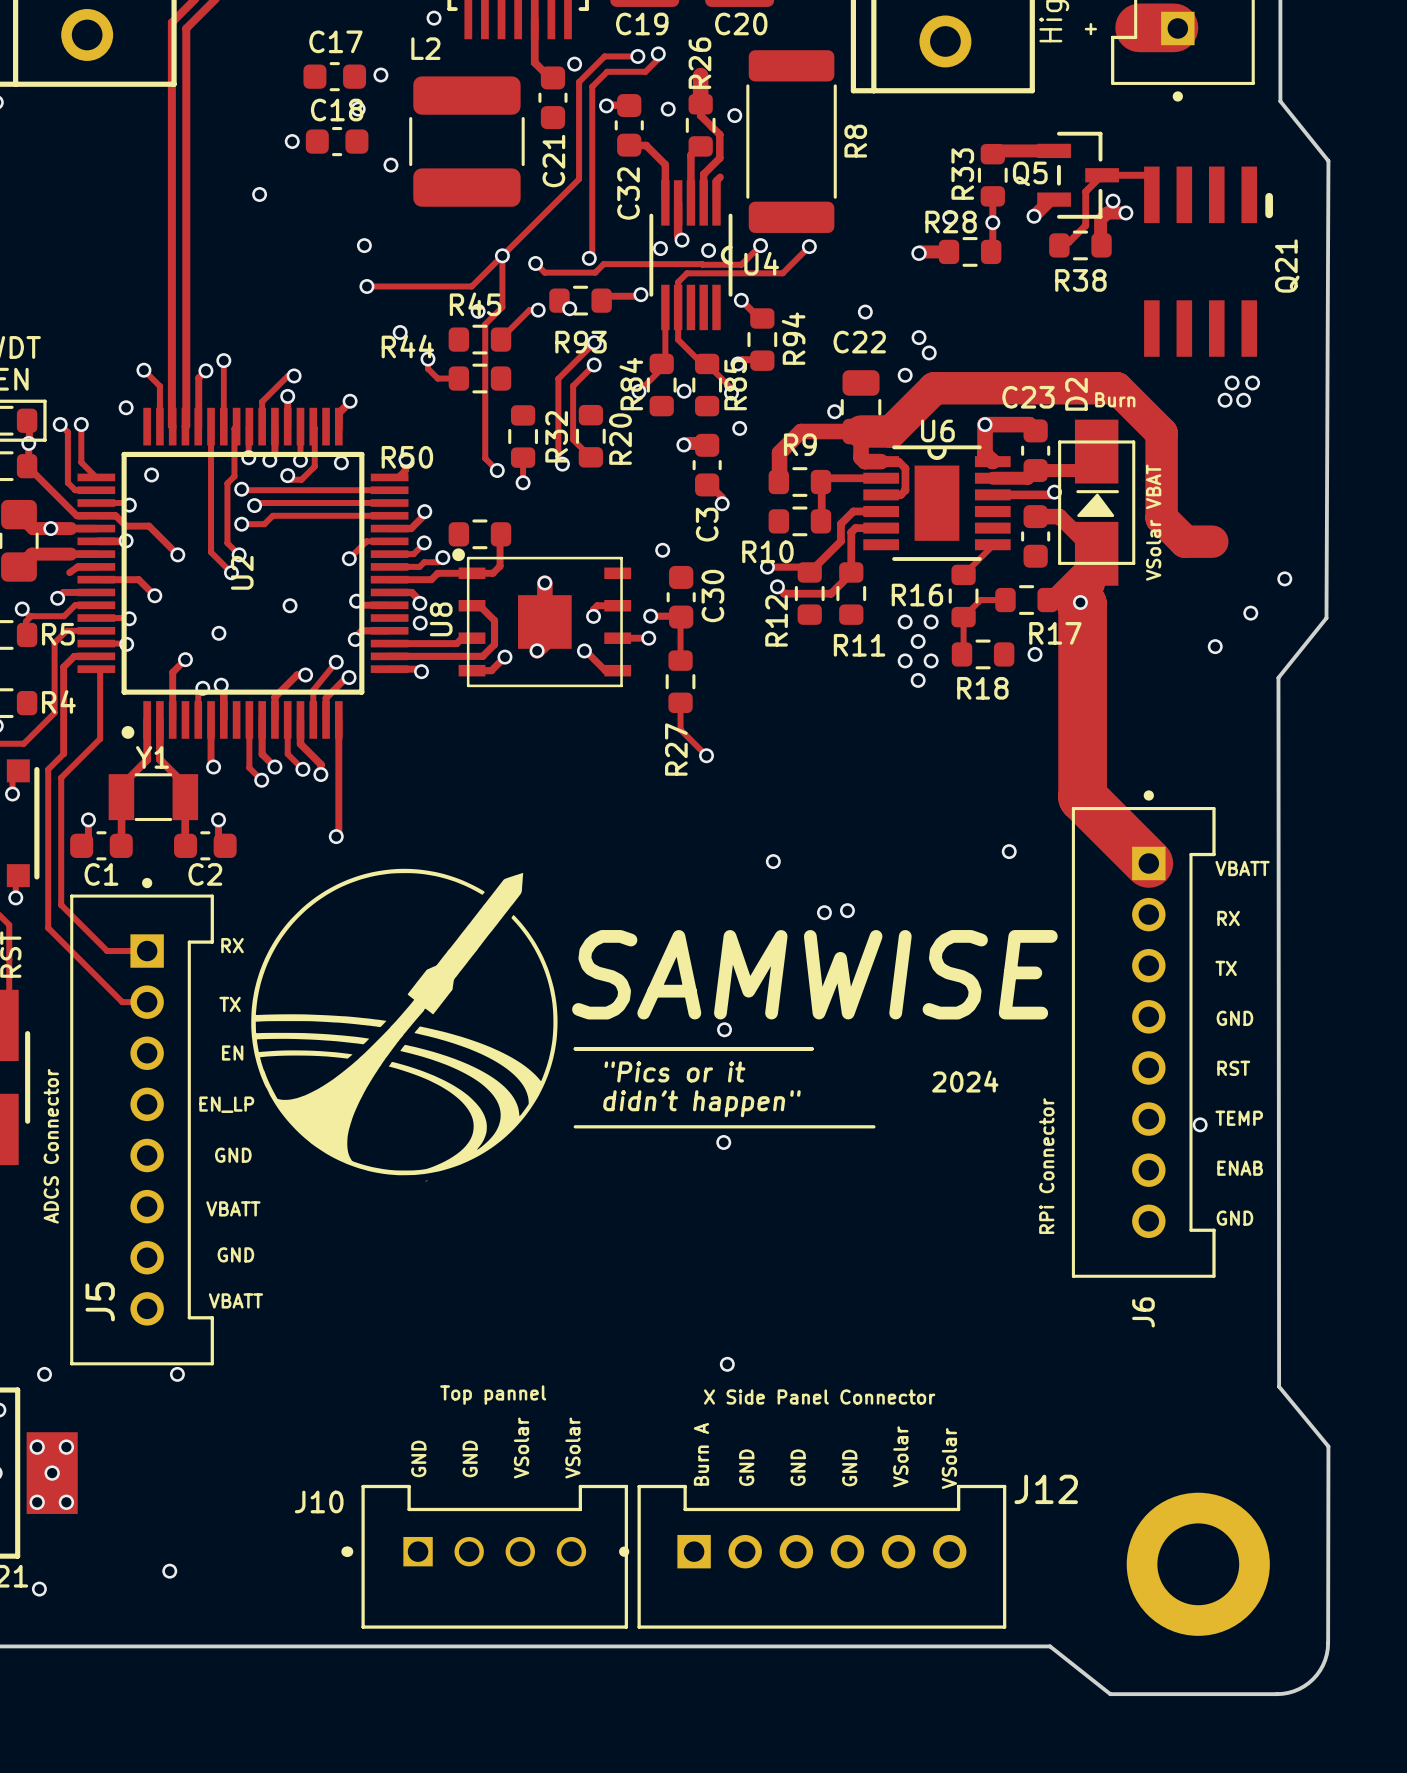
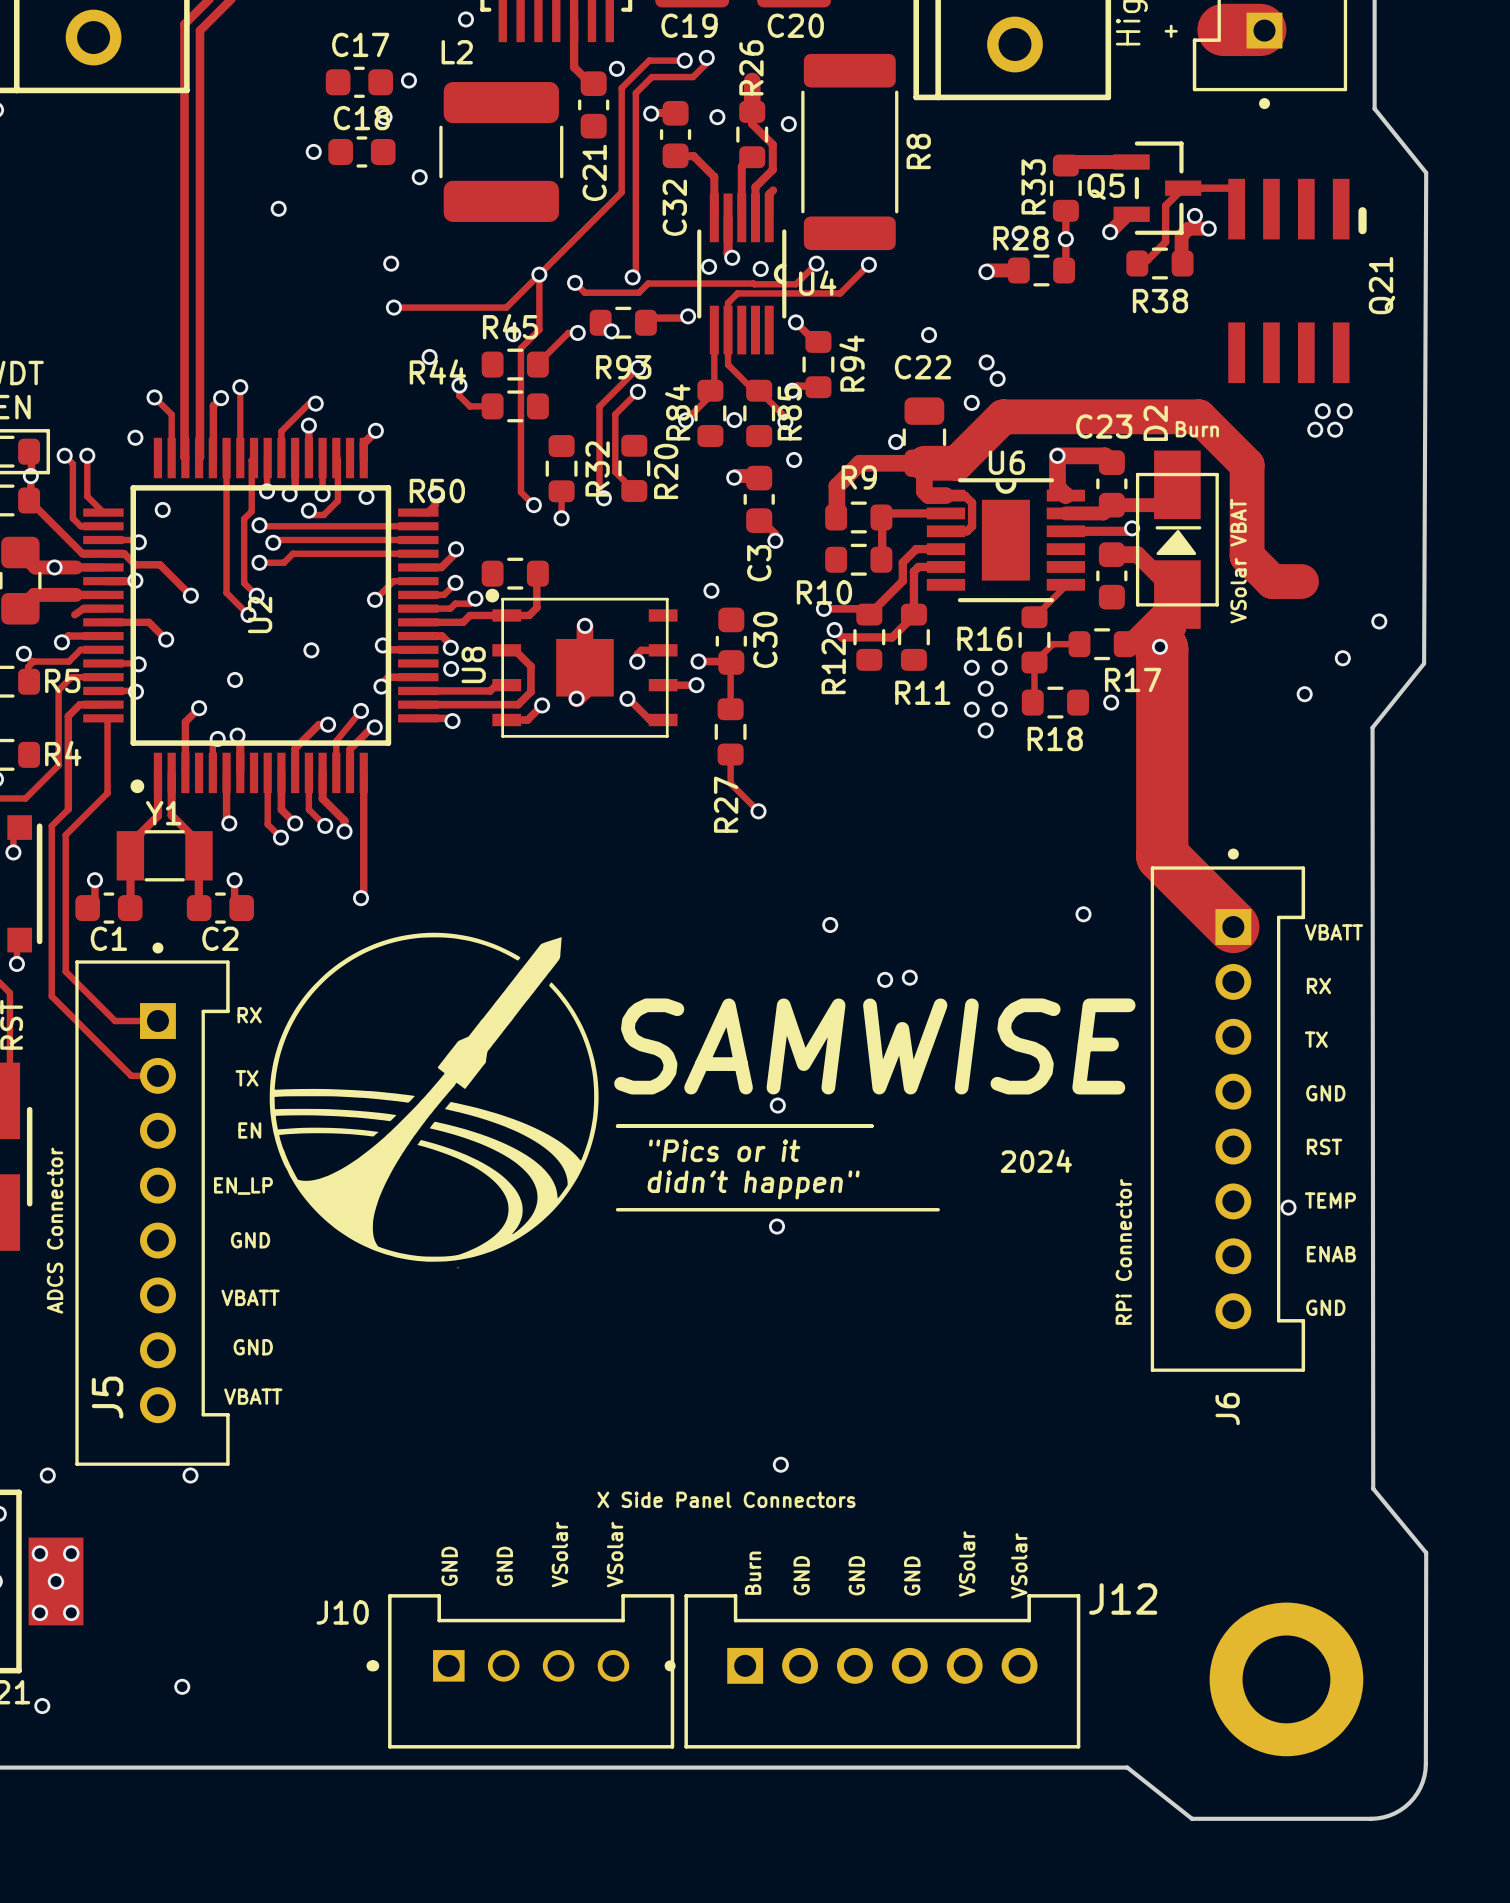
text: Top pannel (493, 1395) -> none
text: X Side Panel Connector (819, 1397) -> X Side Panel Connectors (726, 1499)
text: Burn A (701, 1454) -> Burn (753, 1573)

